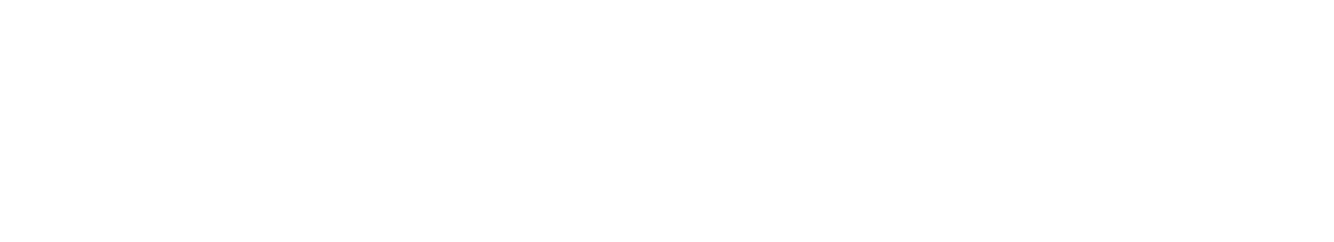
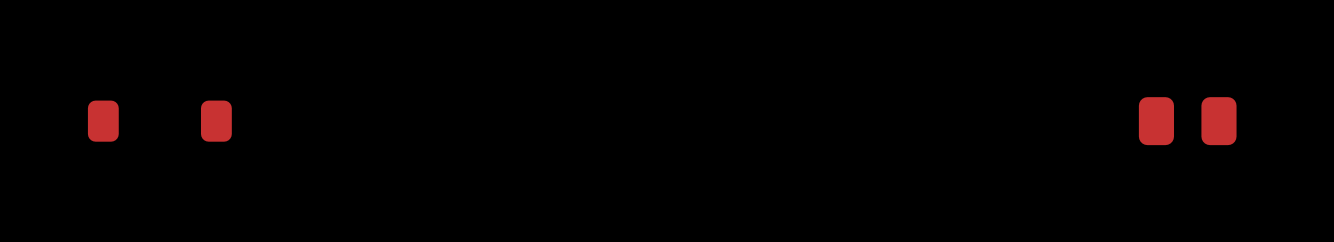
part: none -> (159, 121)
part: none -> (1187, 121)

